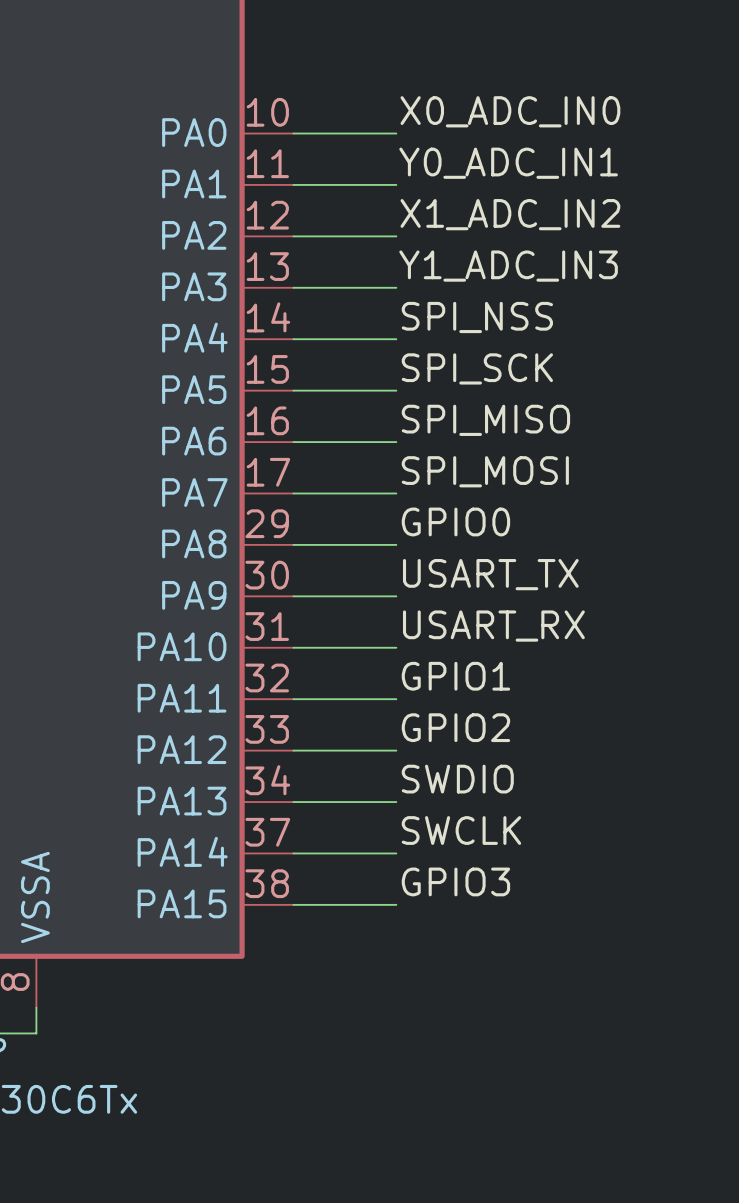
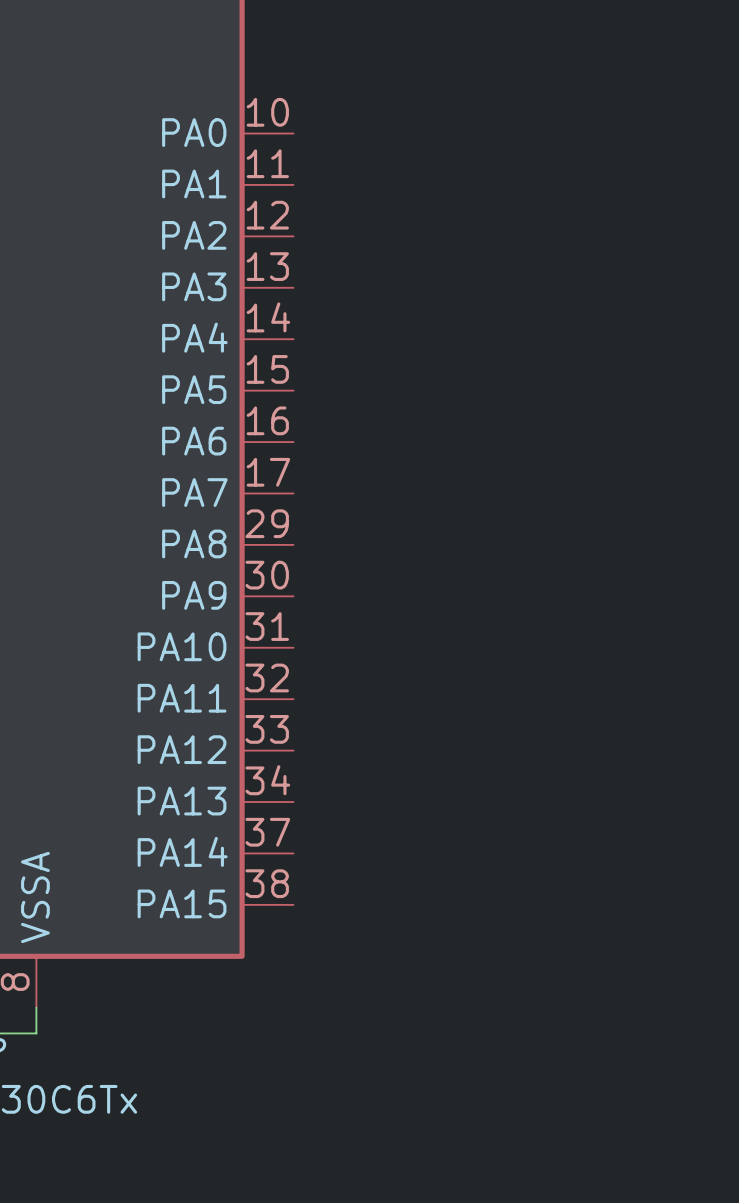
label: X0_ADC_IN0 (510, 111) -> none
wire: (293, 133) (396, 133) -> none
label: Y0_ADC_IN1 (508, 163) -> none
wire: (293, 184) (396, 184) -> none
label: X1_ADC_IN2 (510, 214) -> none
wire: (293, 236) (396, 236) -> none
label: Y1_ADC_IN3 (508, 266) -> none
wire: (293, 287) (396, 287) -> none
label: SPI_NSS (477, 317) -> none
wire: (293, 339) (396, 339) -> none
label: SPI_SCK (477, 368) -> none
wire: (293, 390) (396, 390) -> none
label: SPI_MISO (485, 420) -> none
wire: (293, 442) (396, 442) -> none
label: SPI_MOSI (485, 471) -> none
wire: (293, 493) (396, 493) -> none
label: GPIO0 (455, 521) -> none
wire: (293, 544) (396, 544) -> none
label: USART_TX (490, 574) -> none
wire: (293, 596) (396, 596) -> none
label: USART_RX (493, 626) -> none
wire: (293, 647) (396, 647) -> none
label: GPIO1 (455, 676) -> none
wire: (293, 699) (396, 699) -> none
label: GPIO2 (455, 727) -> none
wire: (293, 750) (396, 750) -> none
label: SWDIO (457, 779) -> none
wire: (293, 802) (396, 802) -> none
label: SWCLK (461, 830) -> none
wire: (293, 853) (396, 853) -> none
label: GPIO3 (455, 881) -> none
wire: (293, 904) (396, 904) -> none

